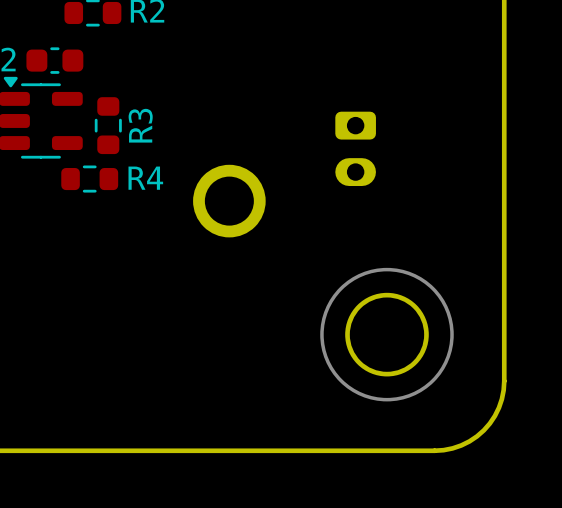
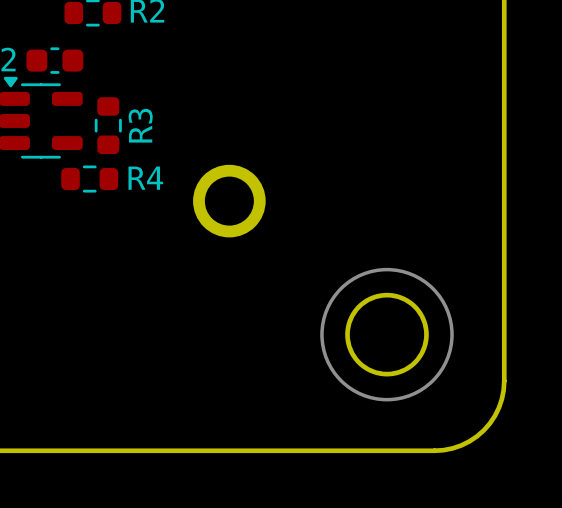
part: (355, 148) -> none

